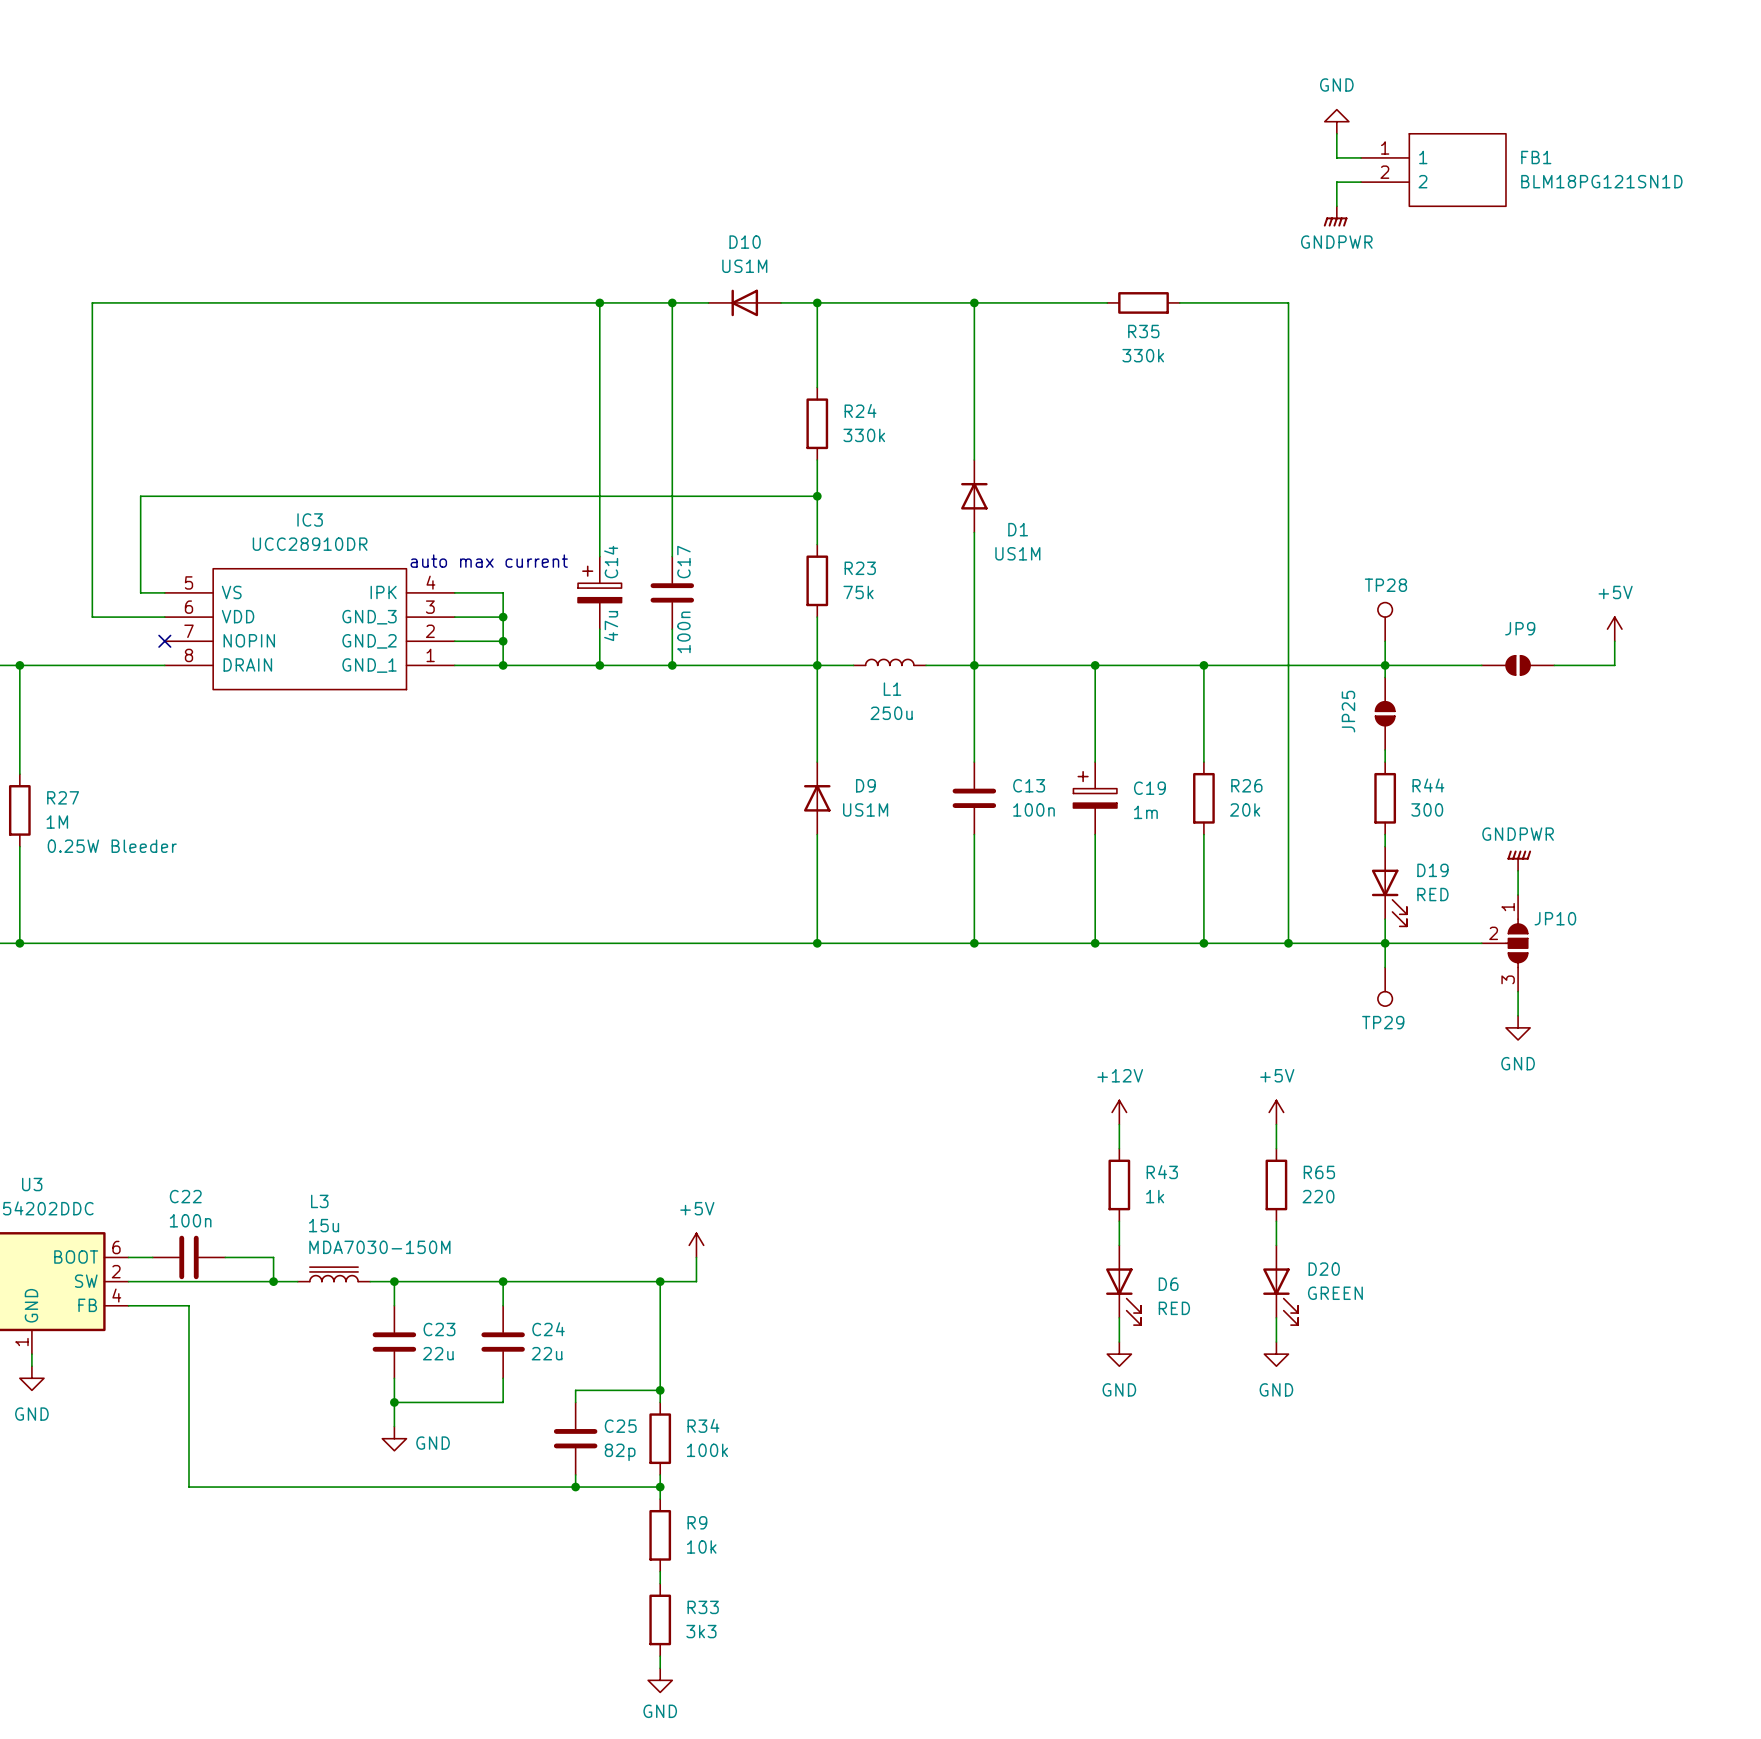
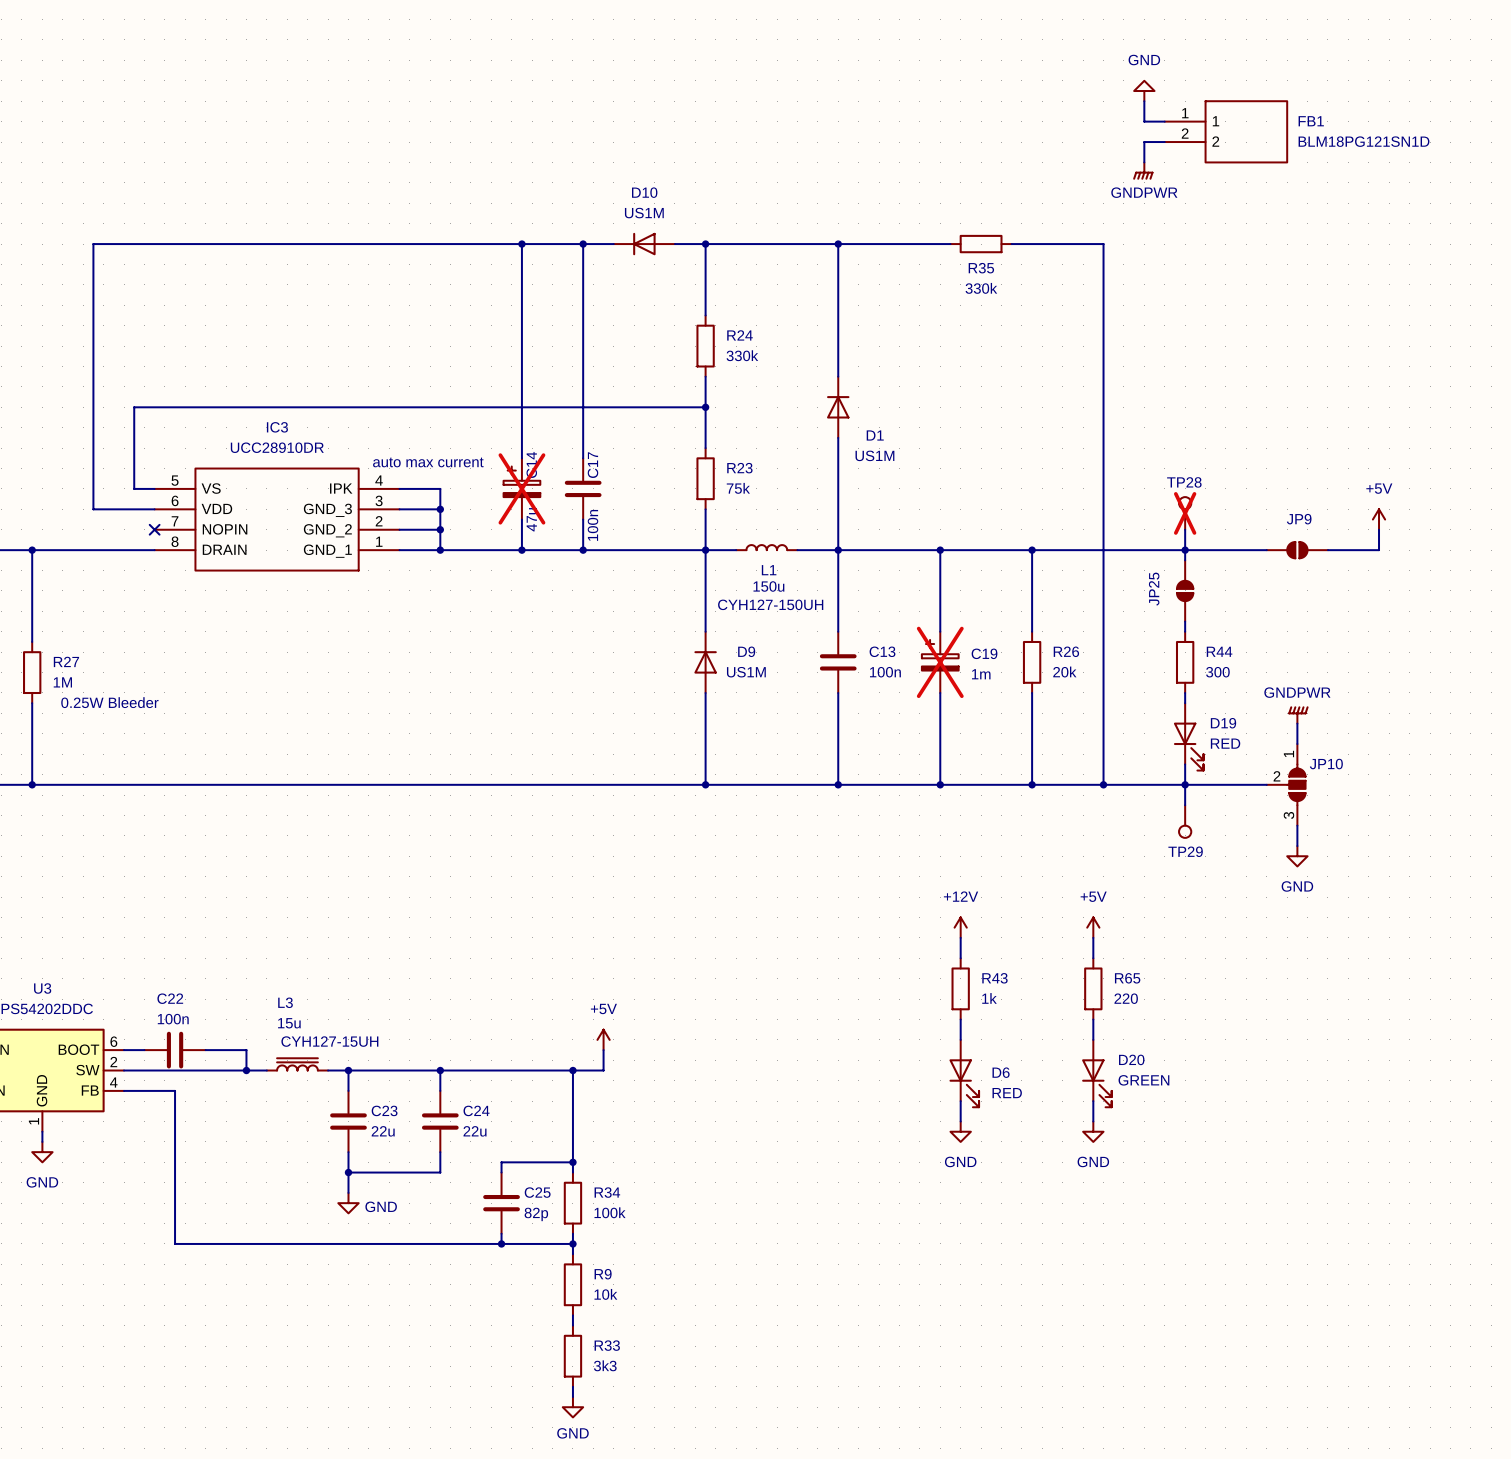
C14 do-not-place cross: none -> (521, 488)
TP28 do-not-place cross: none -> (1185, 513)
L1 value: 250u (891, 713) -> 150u (768, 586)
L1 text: none -> CYH127-150UH (770, 604)
C19 do-not-place cross: none -> (940, 662)
L3 text: MDA7030-150M (379, 1247) -> CYH127-15UH (329, 1041)

